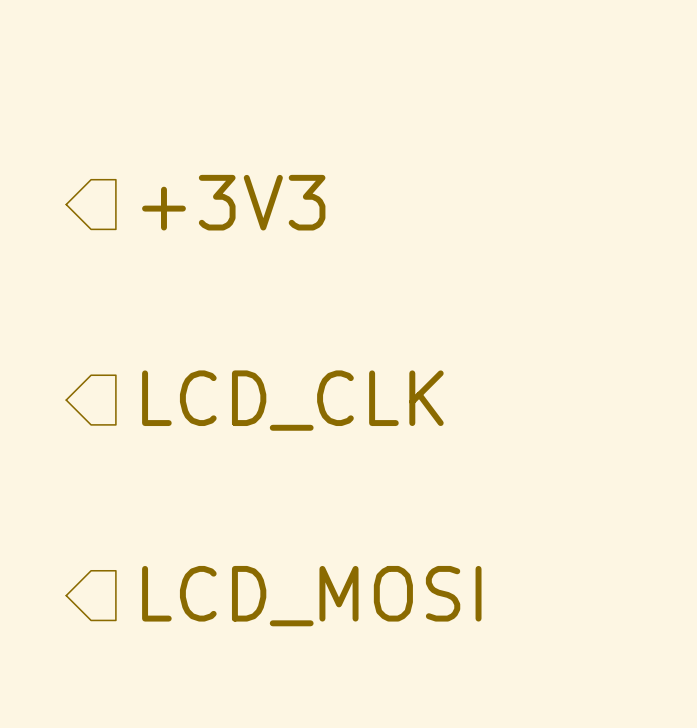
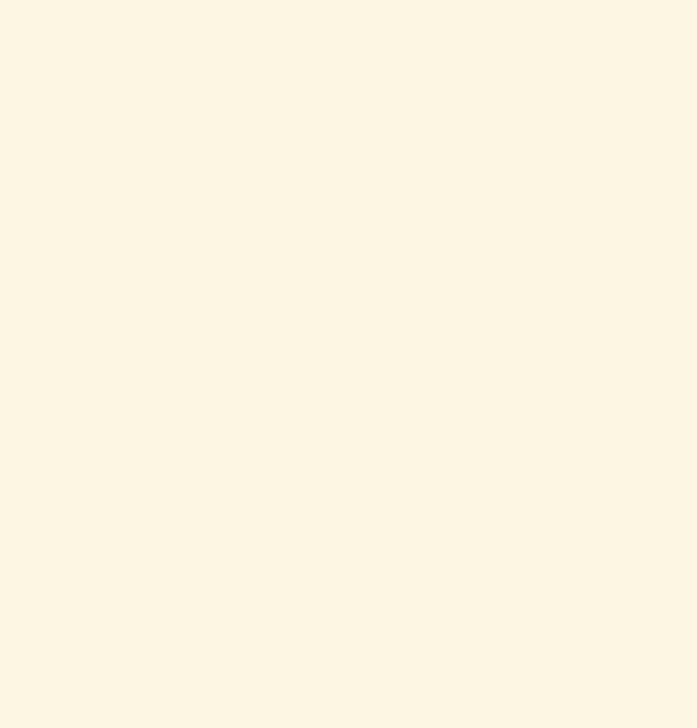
hierarchical label: +3V3 (233, 202) -> none
hierarchical label: LCD_CLK (292, 400) -> none
hierarchical label: LCD_MOSI (311, 596) -> none

